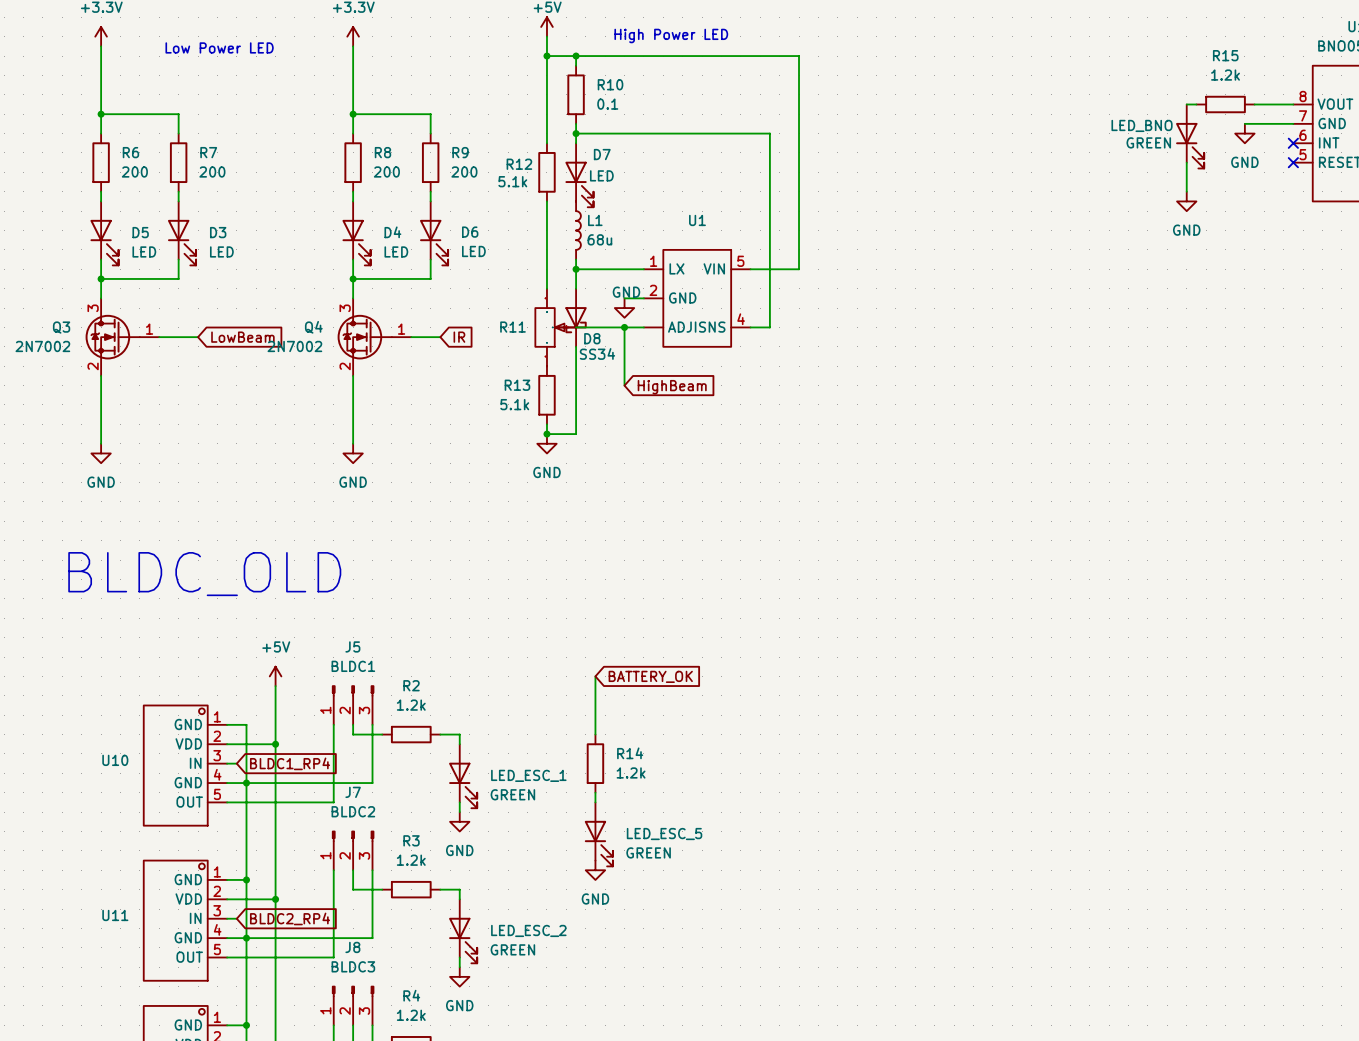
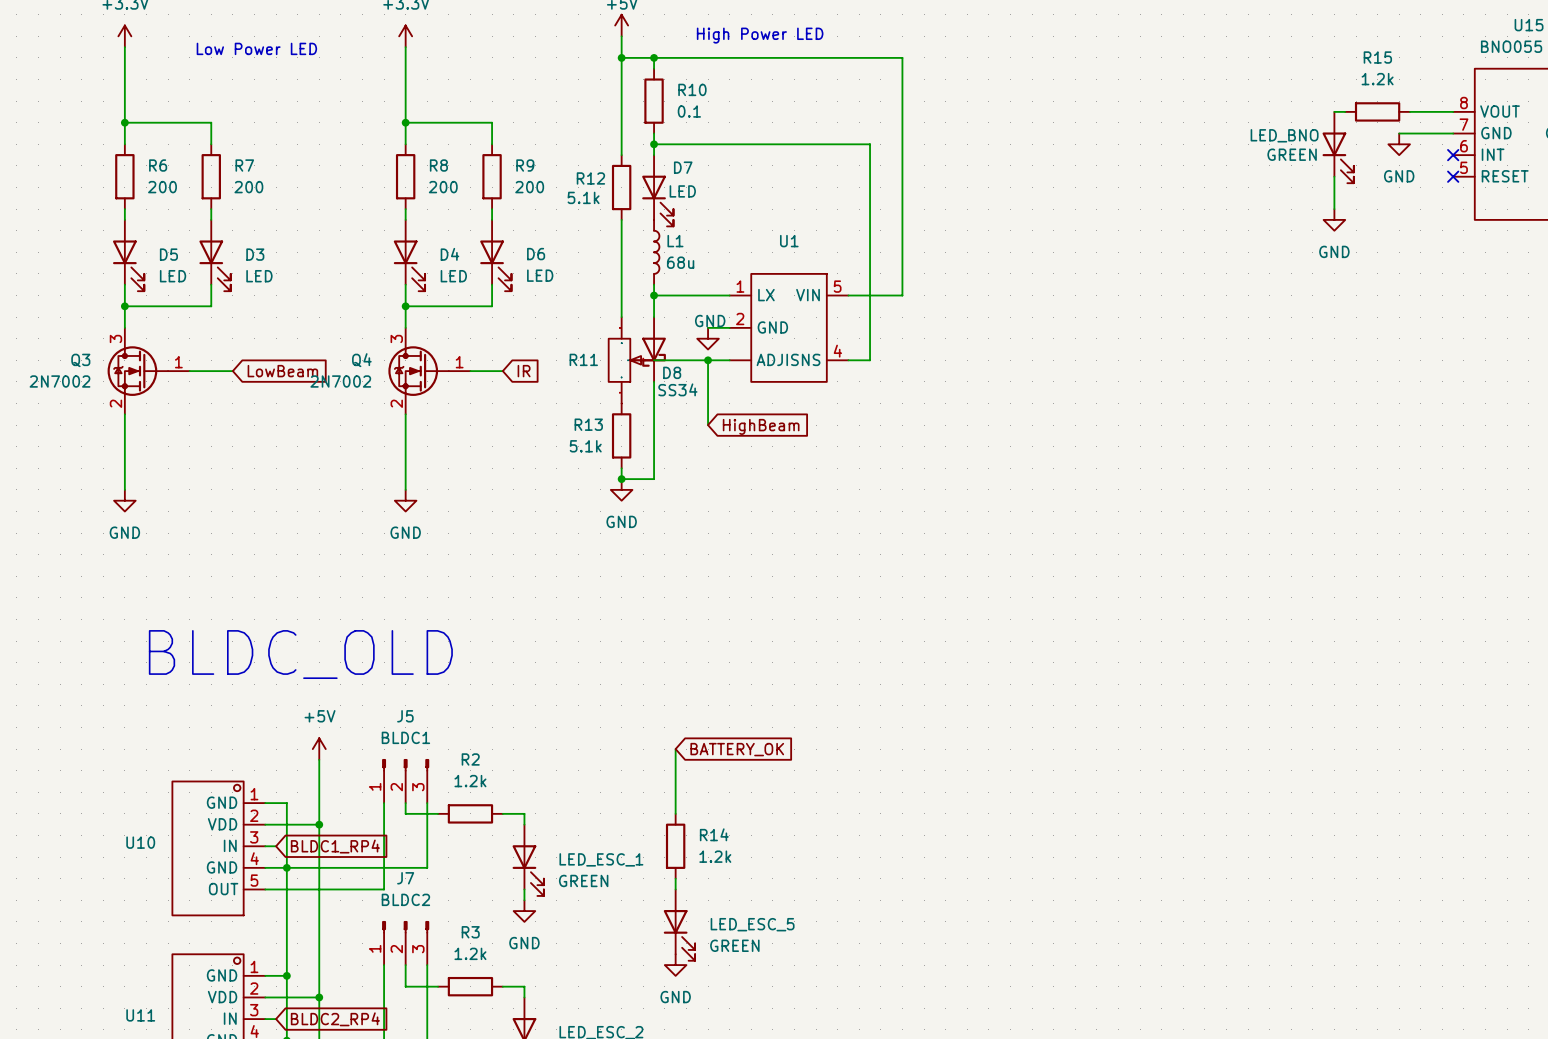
text position: BLDC_OLD (204, 574) -> BLDC_OLD (300, 654)

